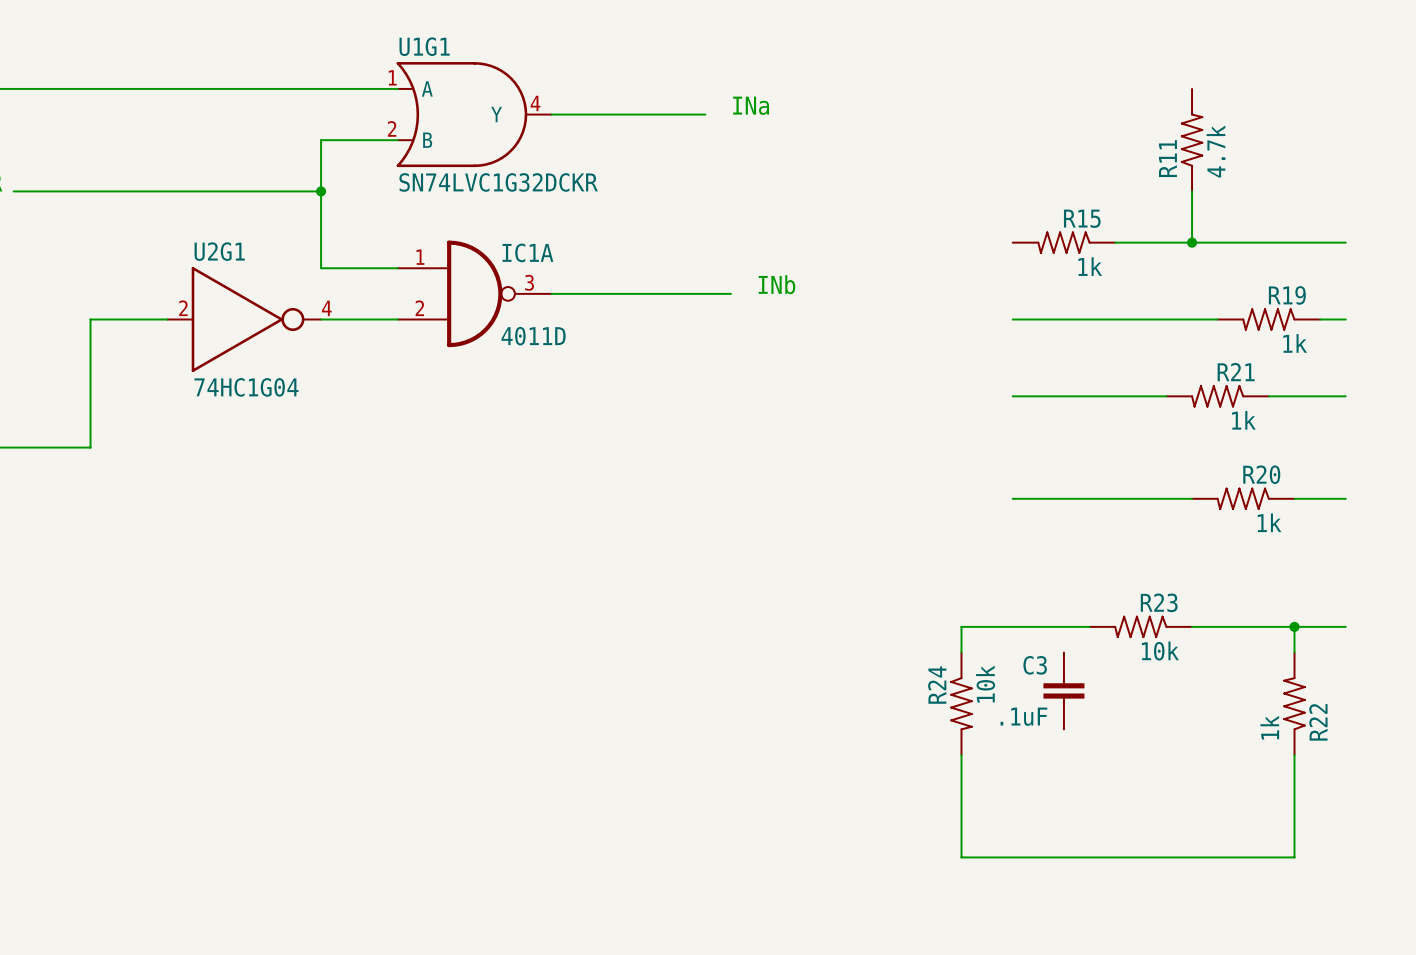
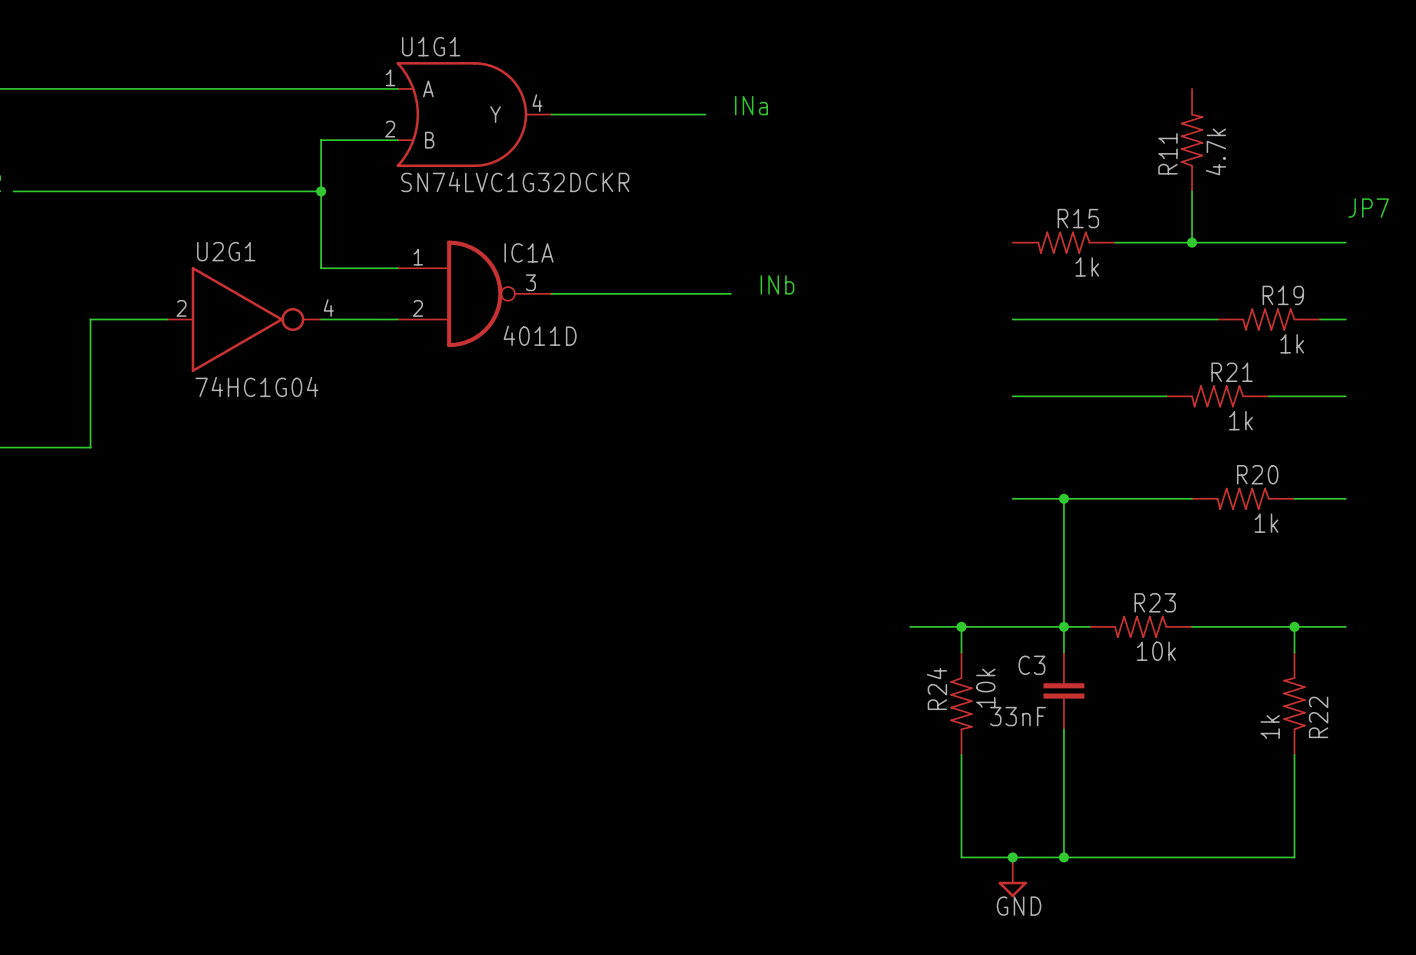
text: none -> JP7 (1368, 208)
wire: none -> (1063, 498) (1063, 652)
junction: none -> (1063, 498)
wire: none -> (910, 626) (961, 626)
junction: none -> (961, 626)
junction: none -> (1063, 626)
C3 value: .1uF (1023, 716) -> 33nF (1018, 716)
wire: none -> (1063, 729) (1063, 857)
junction: none -> (1012, 857)
junction: none -> (1063, 857)
power symbol: none -> GND (1012, 877)

